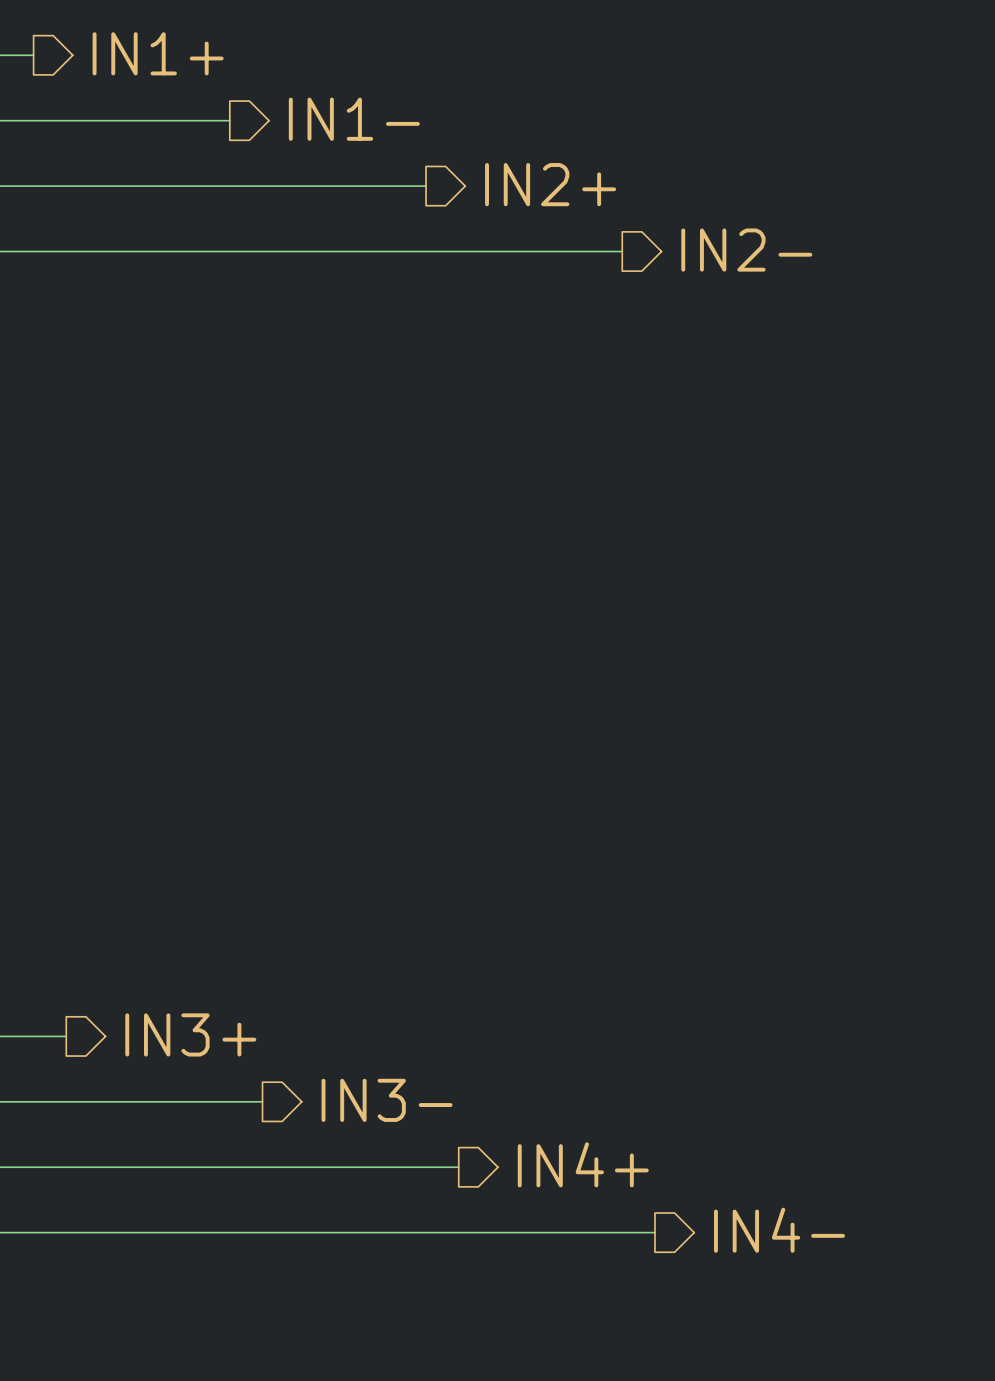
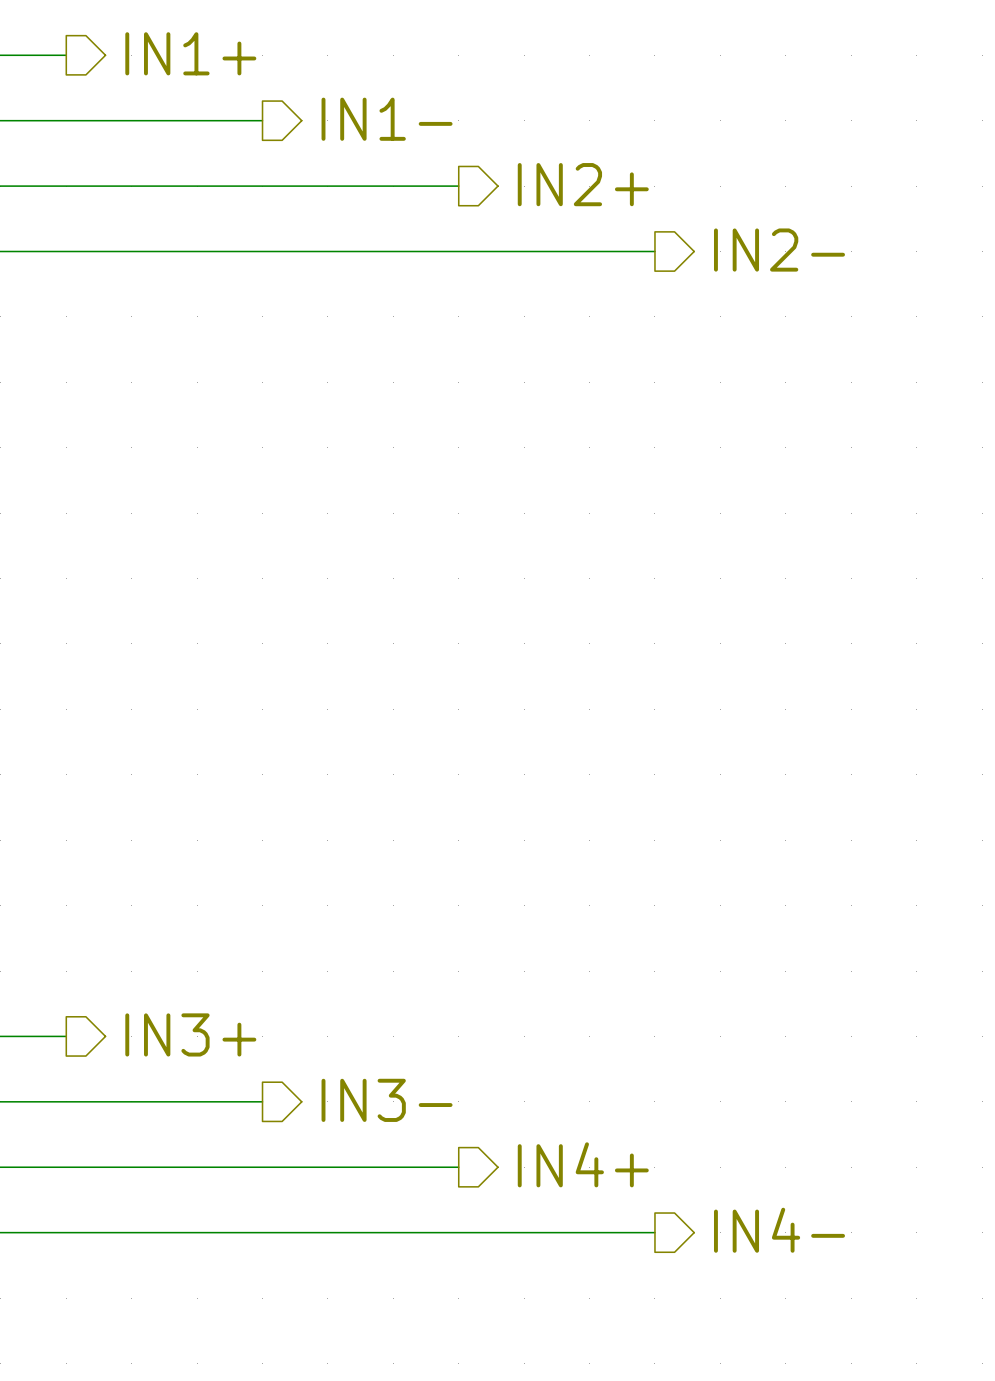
hierarchical label position: IN1+ (158, 53) -> IN1+ (190, 53)
wire: none -> (33, 55) (66, 55)
hierarchical label position: IN1- (354, 119) -> IN1- (387, 119)
wire: none -> (229, 120) (262, 120)
hierarchical label position: IN2+ (550, 184) -> IN2+ (583, 184)
wire: none -> (426, 186) (458, 186)
hierarchical label position: IN2- (746, 250) -> IN2- (779, 250)
wire: none -> (622, 251) (654, 251)

